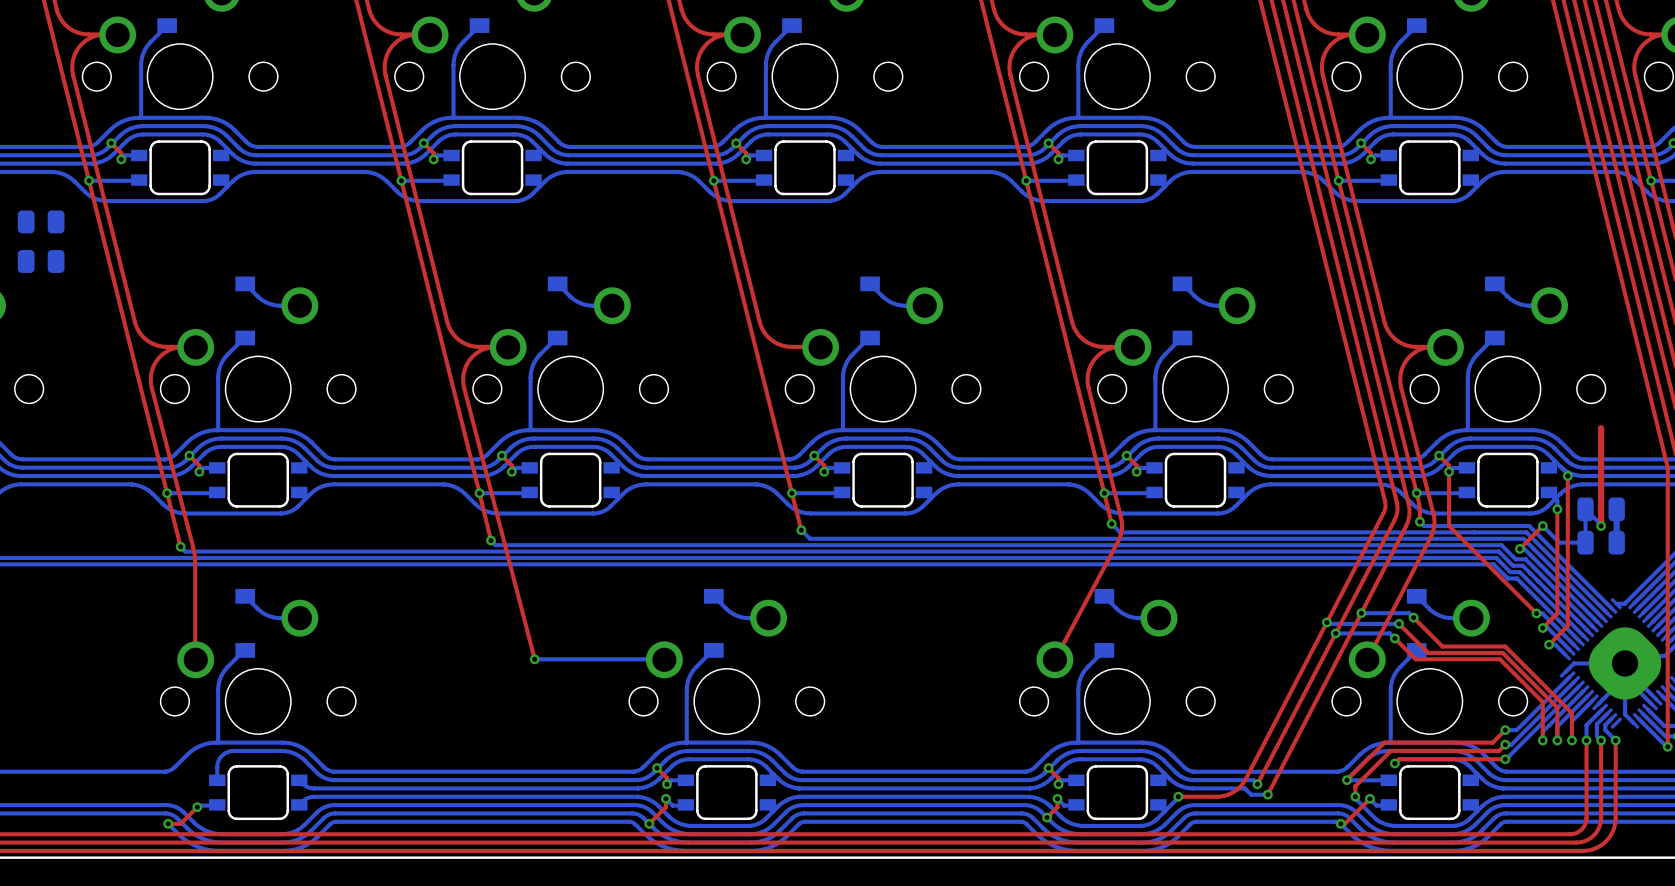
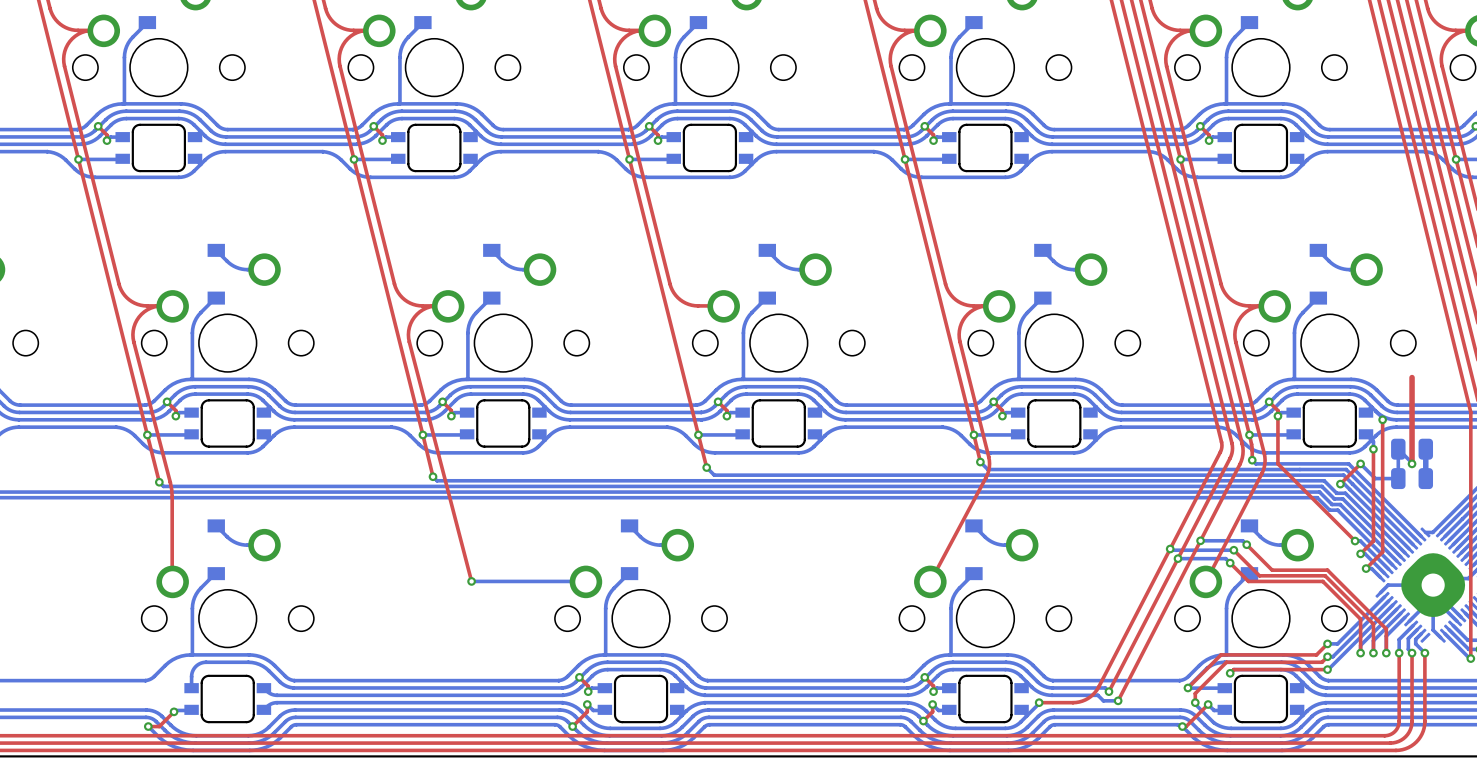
part: (41, 221) -> none
part: (41, 261) -> none

